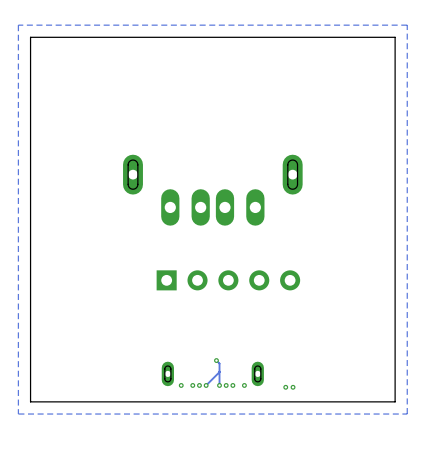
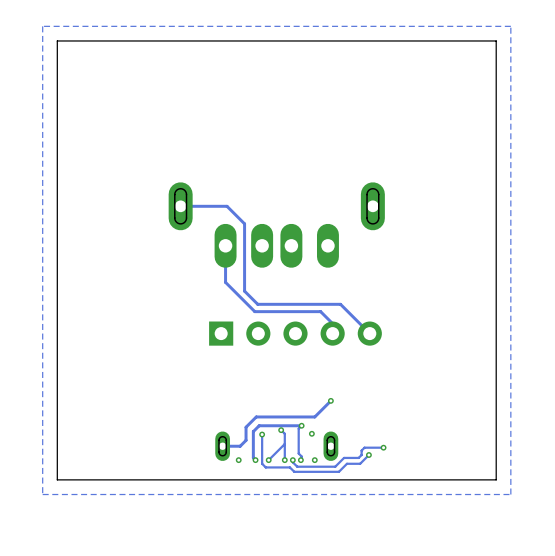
track: none -> (180, 206) (227, 206) (244, 223) (244, 291) (257, 304) (340, 304) (369, 333)
track: none -> (225, 245) (225, 282) (254, 311) (320, 311) (332, 323) (332, 333)
track: none -> (330, 400) (314, 416) (256, 416) (246, 427) (246, 440) (240, 446) (222, 446)
via: none -> (330, 400)
via: none -> (301, 425)
via: none -> (311, 433)
track: none -> (262, 434) (262, 463) (265, 467) (289, 467) (294, 471) (338, 471) (346, 463) (360, 463) (368, 455)
via: none -> (262, 434)
track: none -> (383, 447) (364, 447) (358, 457) (344, 457) (335, 466) (297, 466) (292, 460)
via: none -> (383, 447)
via: none -> (368, 455)
via: (192, 385) -> none
via: none -> (255, 460)
via: (199, 385) -> none
track: none -> (301, 460) (298, 453) (298, 428) (301, 425) (259, 425) (253, 431) (253, 457) (255, 460)
via: (285, 387) -> none
via: (293, 387) -> none

